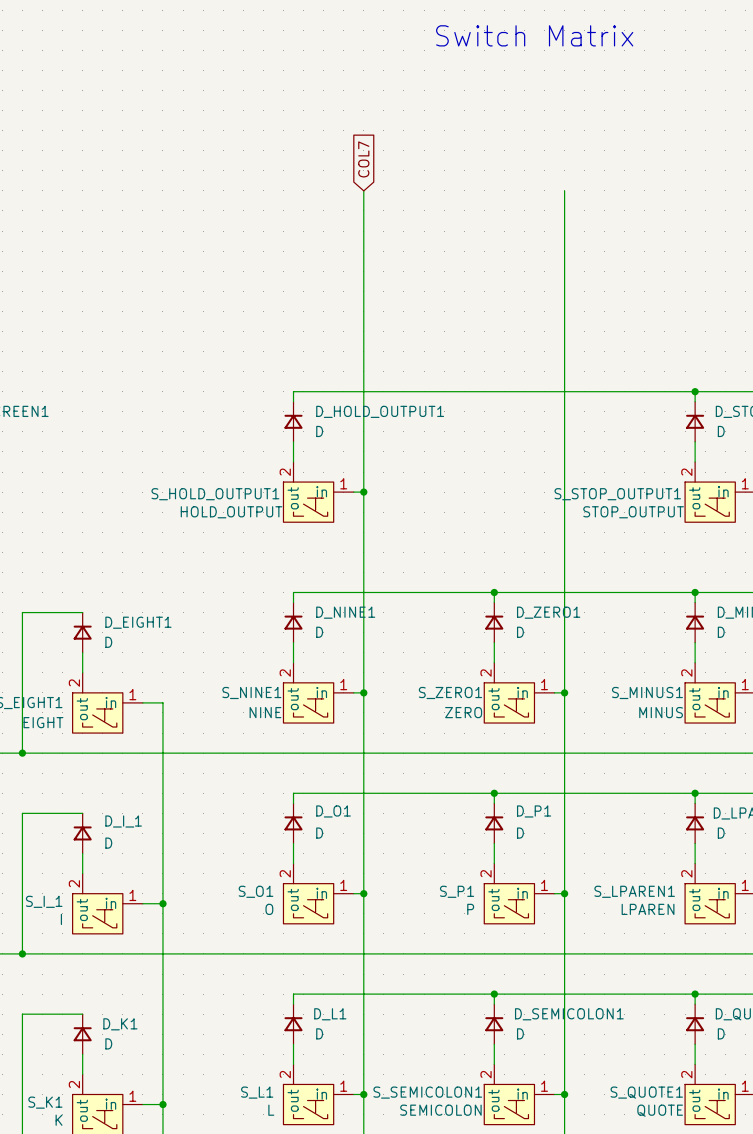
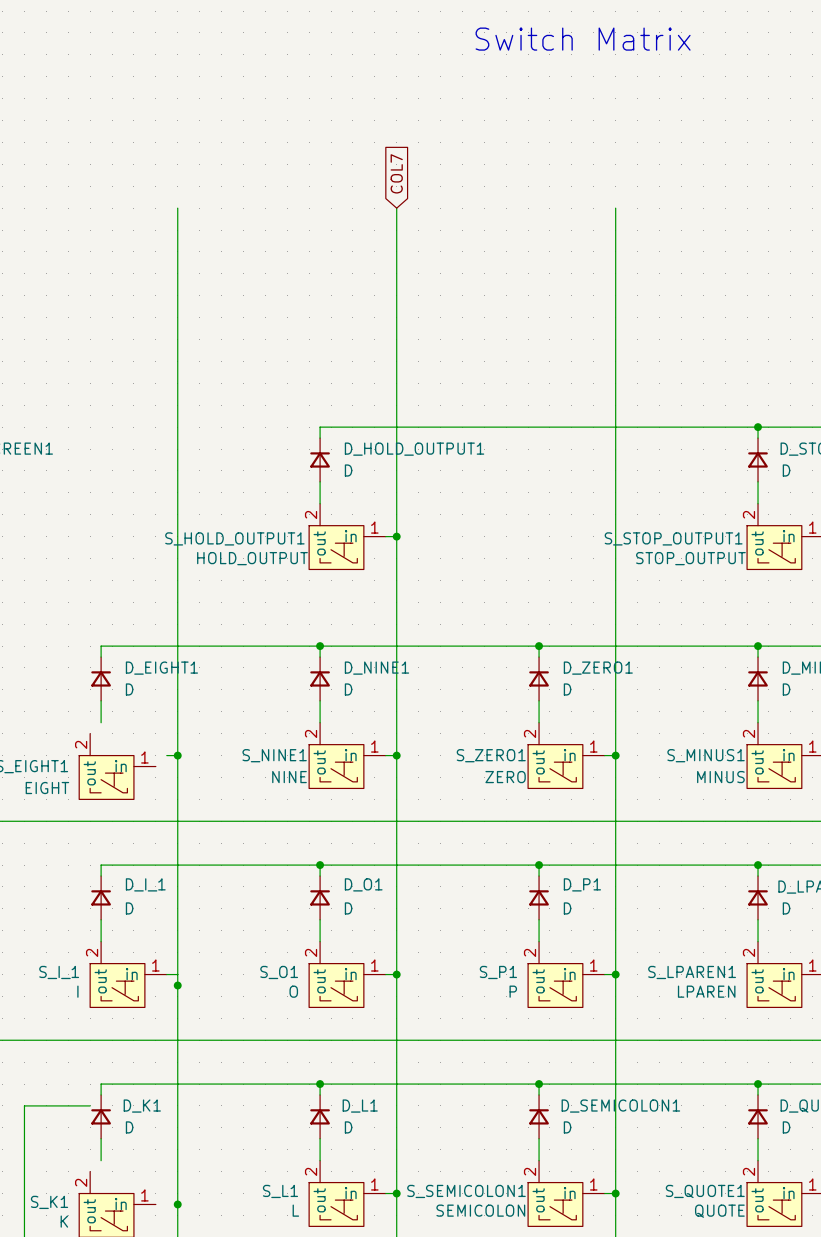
wire: none -> (320, 646) (101, 646) (101, 657)
junction: none -> (320, 646)
wire: (82, 612) (22, 612) (22, 753) -> none
D_EIGHT1 position: (82, 632) -> (101, 678)
wire: (82, 652) (82, 672) -> (101, 700) (101, 722)
wire: none -> (166, 755) (177, 755)
junction: none -> (177, 755)
wire: (142, 702) (162, 702) -> (177, 208) (177, 766)
junction: (22, 753) -> none
wire: none -> (320, 865) (101, 865) (101, 876)
junction: none -> (320, 865)
wire: (82, 813) (22, 813) (22, 953) -> none
D_I_1 position: (82, 833) -> (101, 897)
wire: (82, 853) (82, 873) -> (101, 919) (101, 941)
wire: none -> (166, 974) (177, 974)
S_I_1 position: (107, 903) -> (128, 974)
wire: (142, 903) (162, 903) -> none
junction: (22, 953) -> none
wire: none -> (320, 1084) (101, 1084) (101, 1094)
junction: none -> (320, 1084)
D_K1 position: (82, 1034) -> (101, 1116)
wire: (82, 1054) (82, 1074) -> (101, 1138) (101, 1160)
wire: (142, 1104) (162, 1104) -> none

